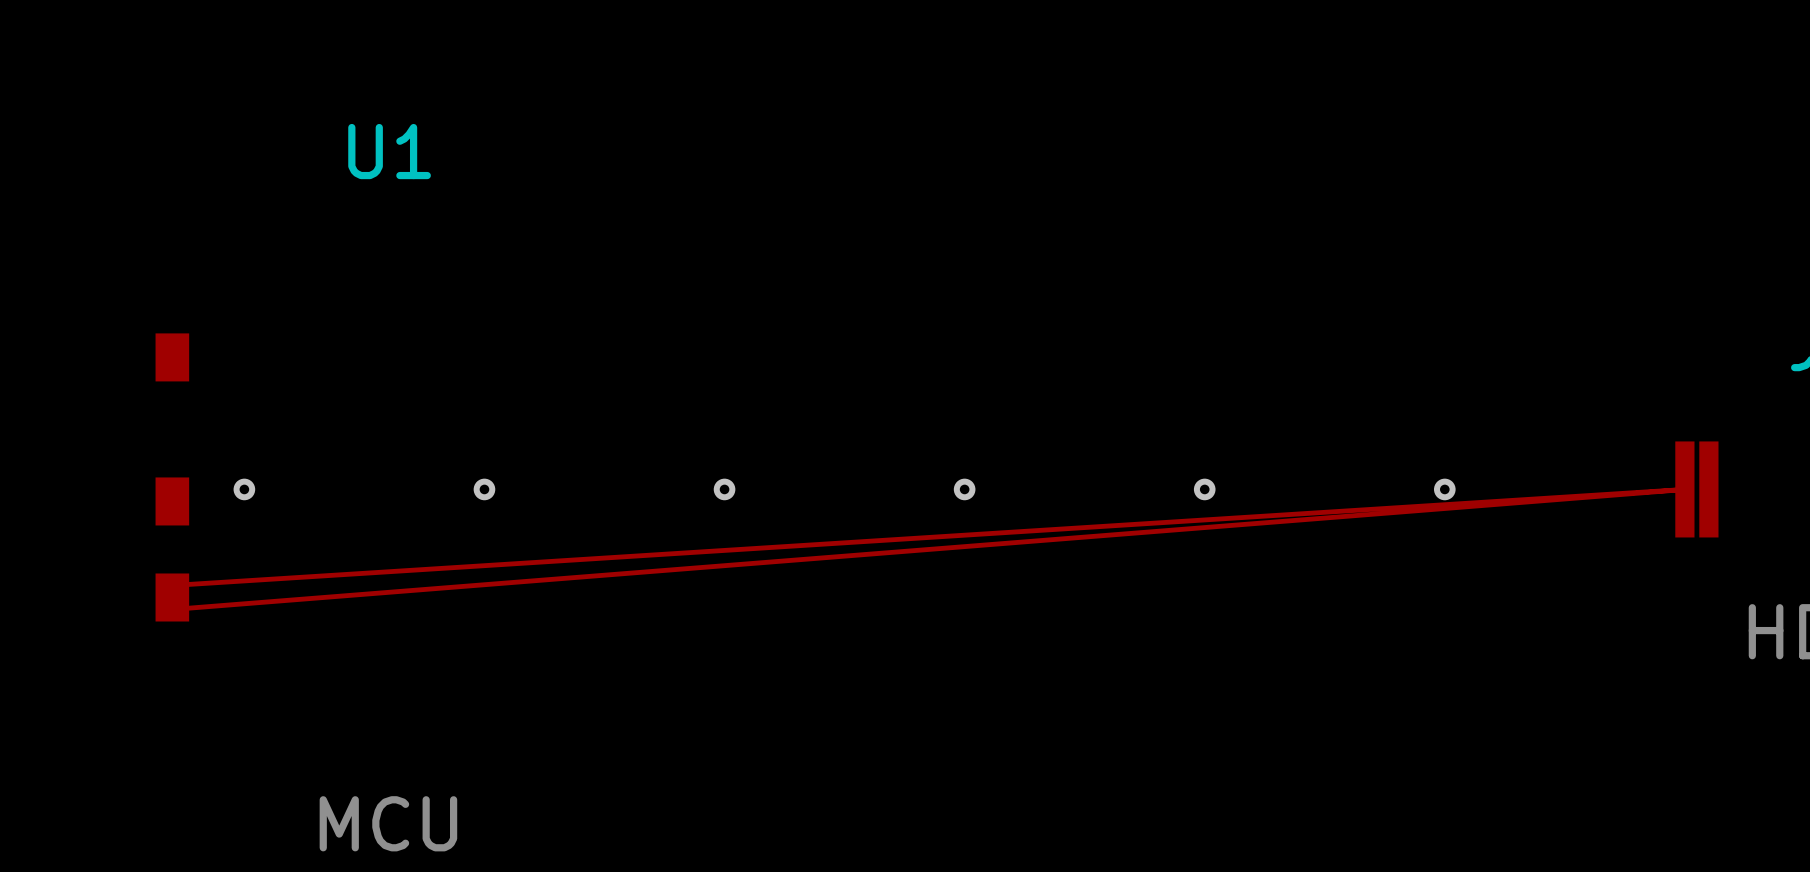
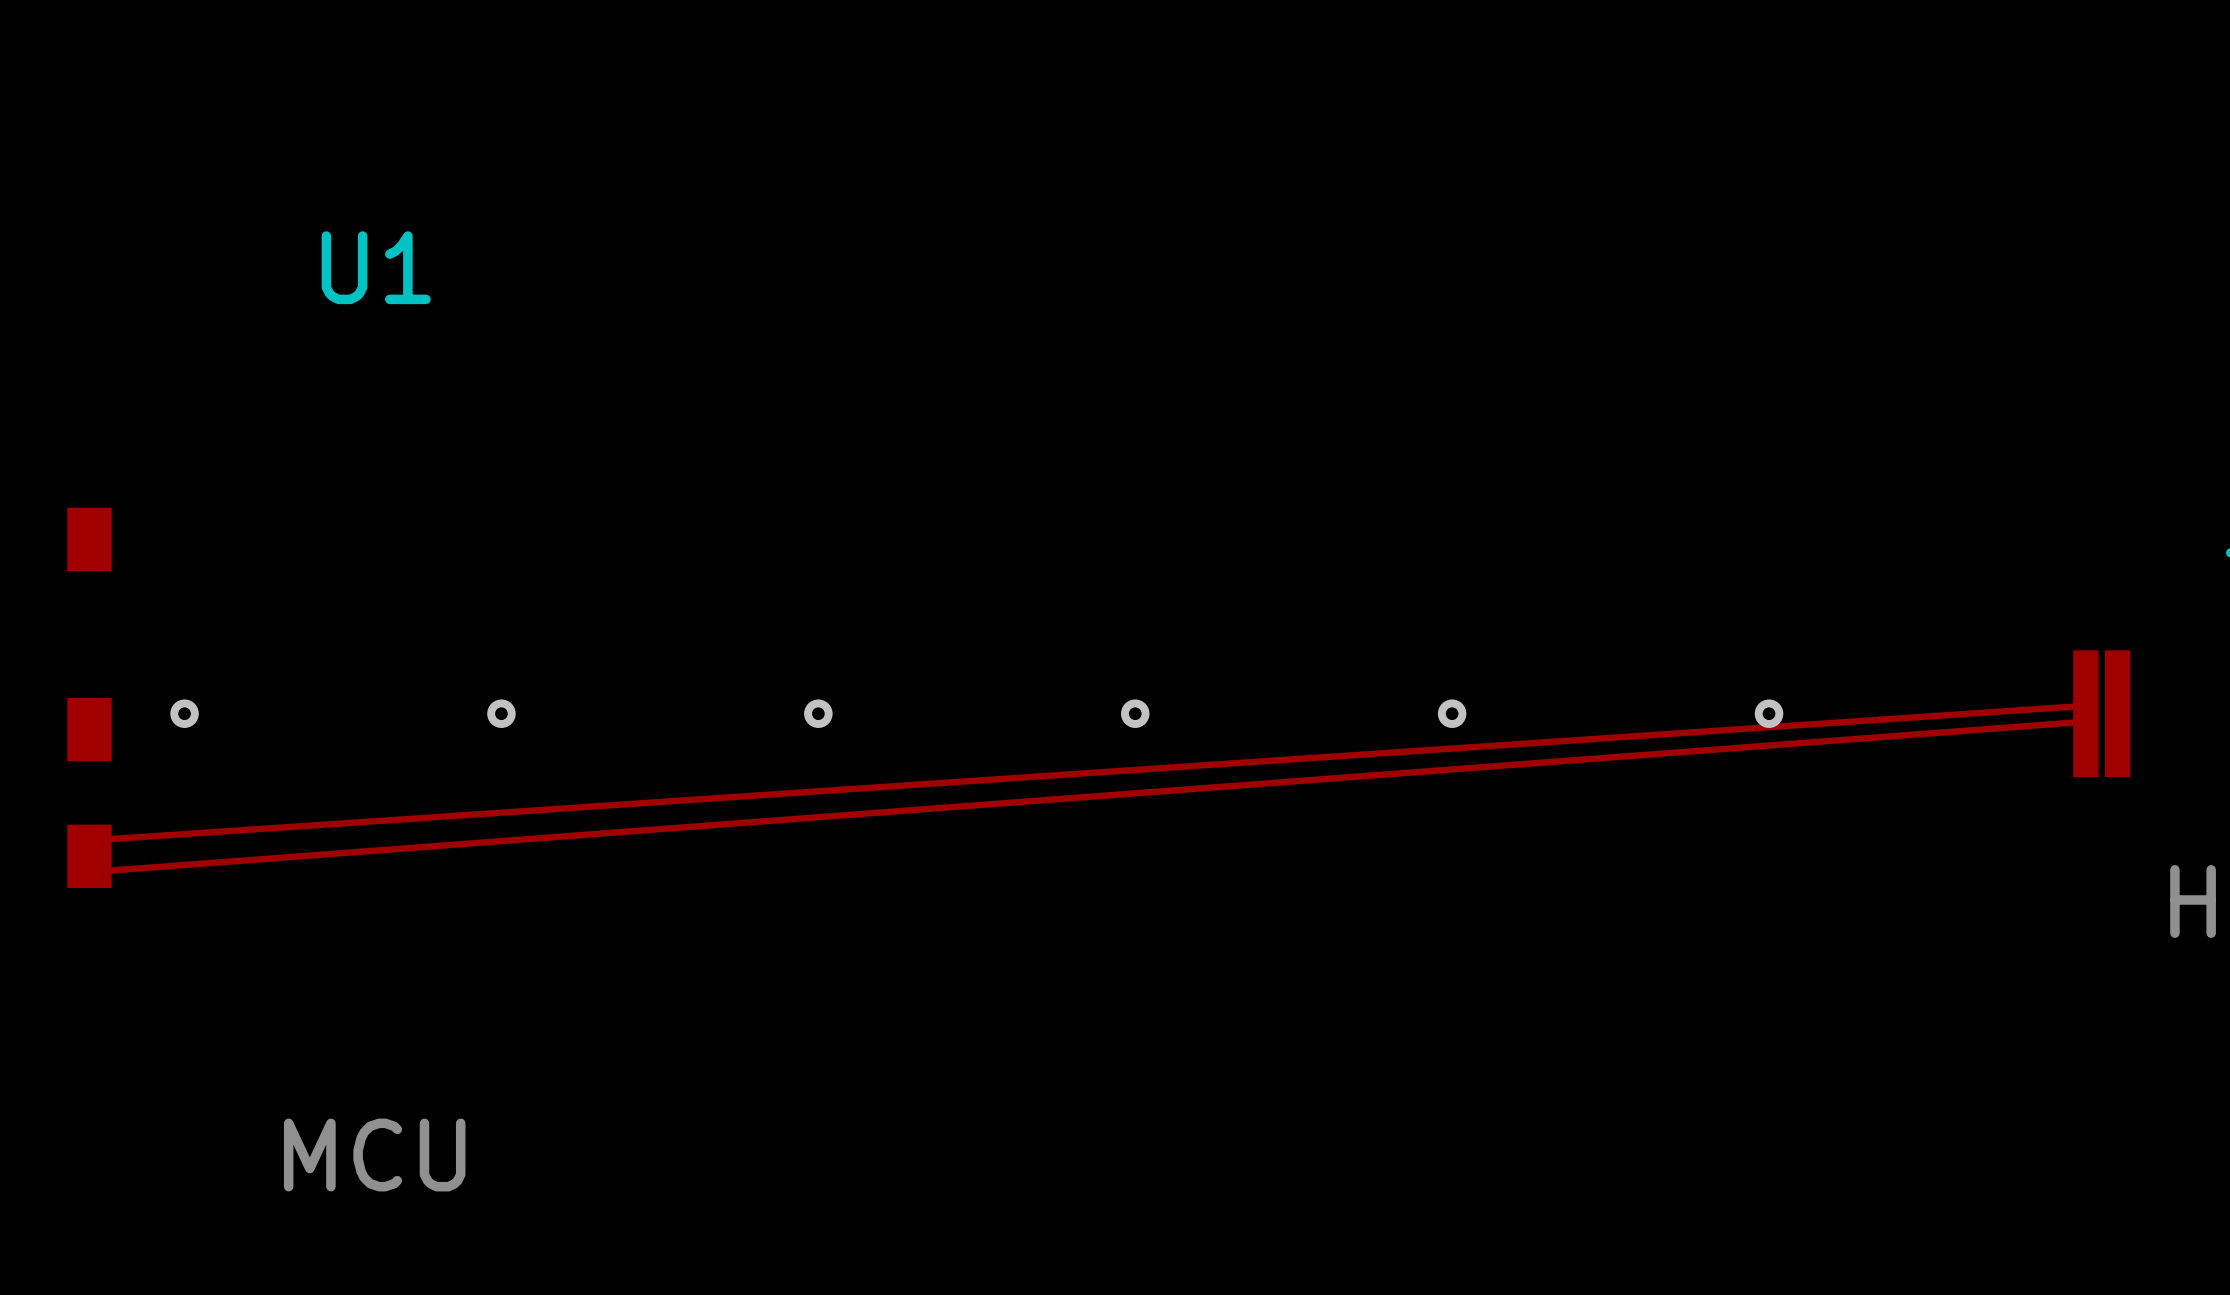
top track: none -> (2085, 705) (89, 840)
top track: (172, 585) (1684, 489) (172, 609) -> (2085, 721) (89, 872)

